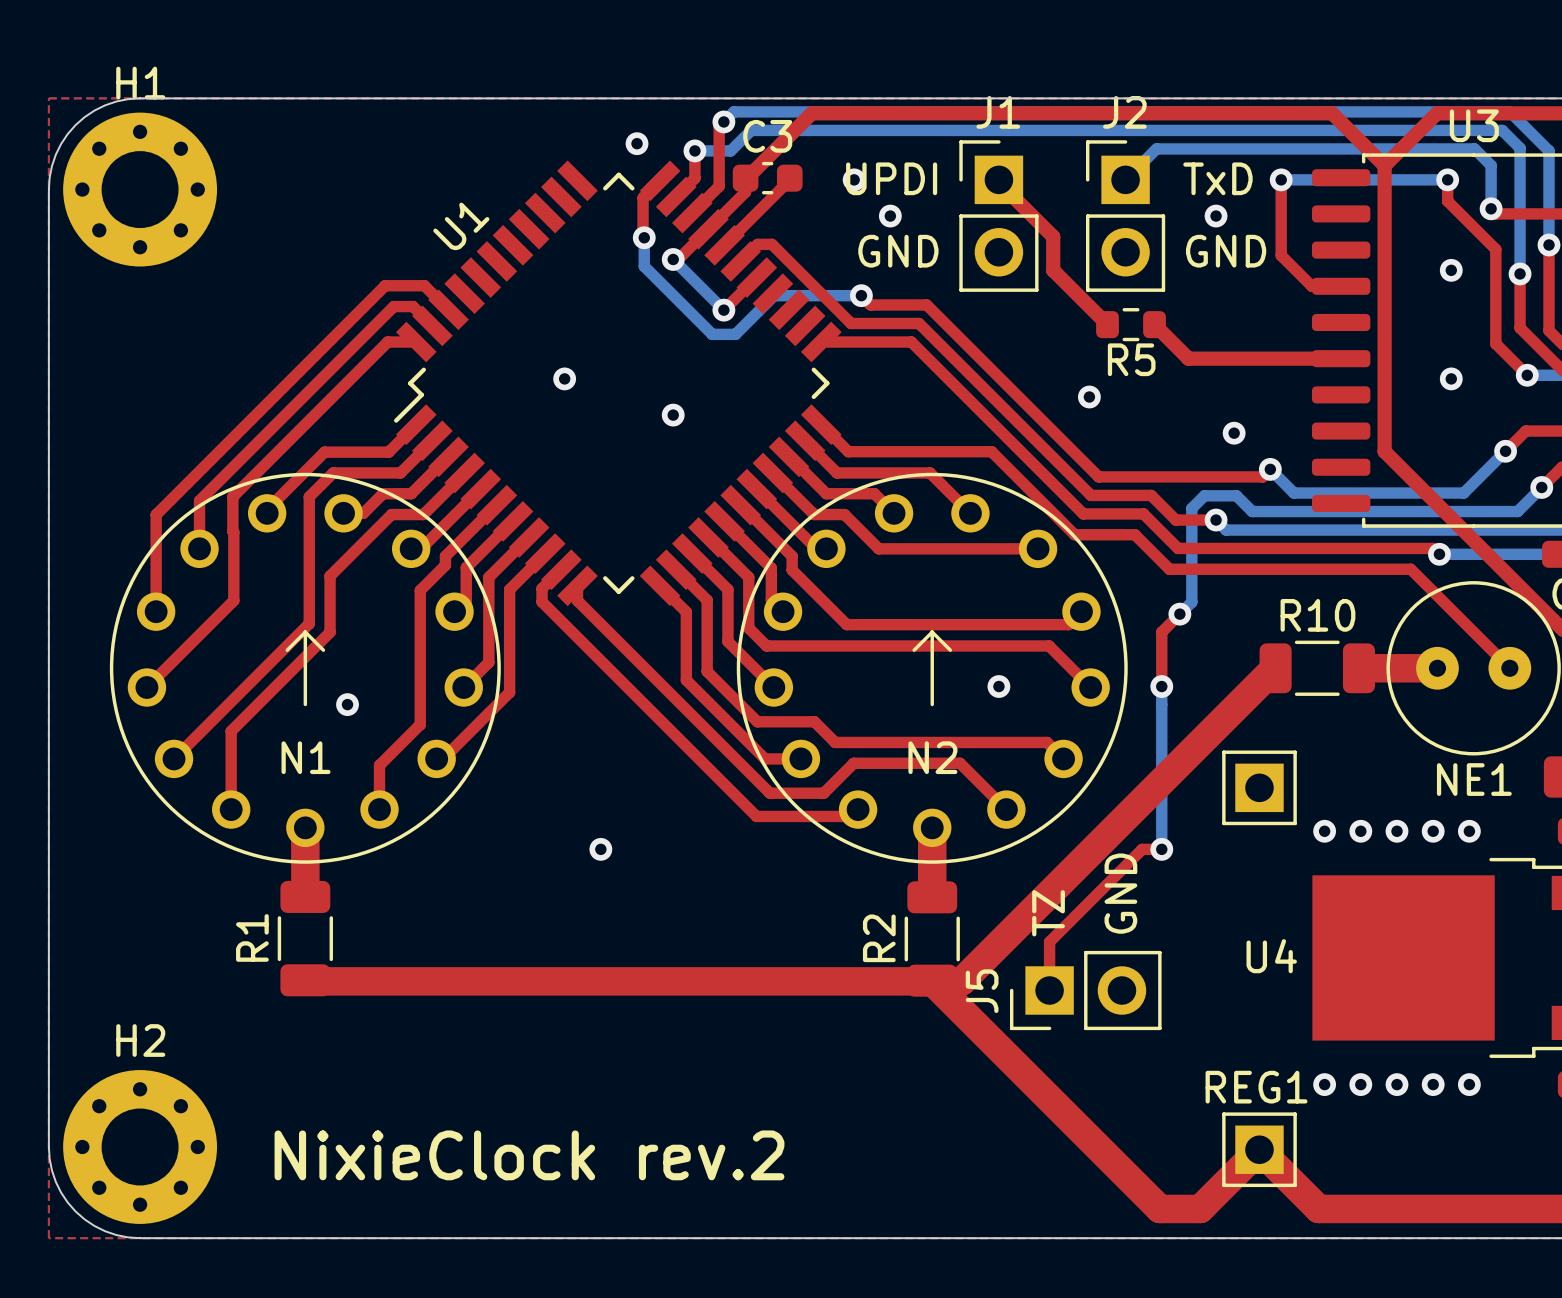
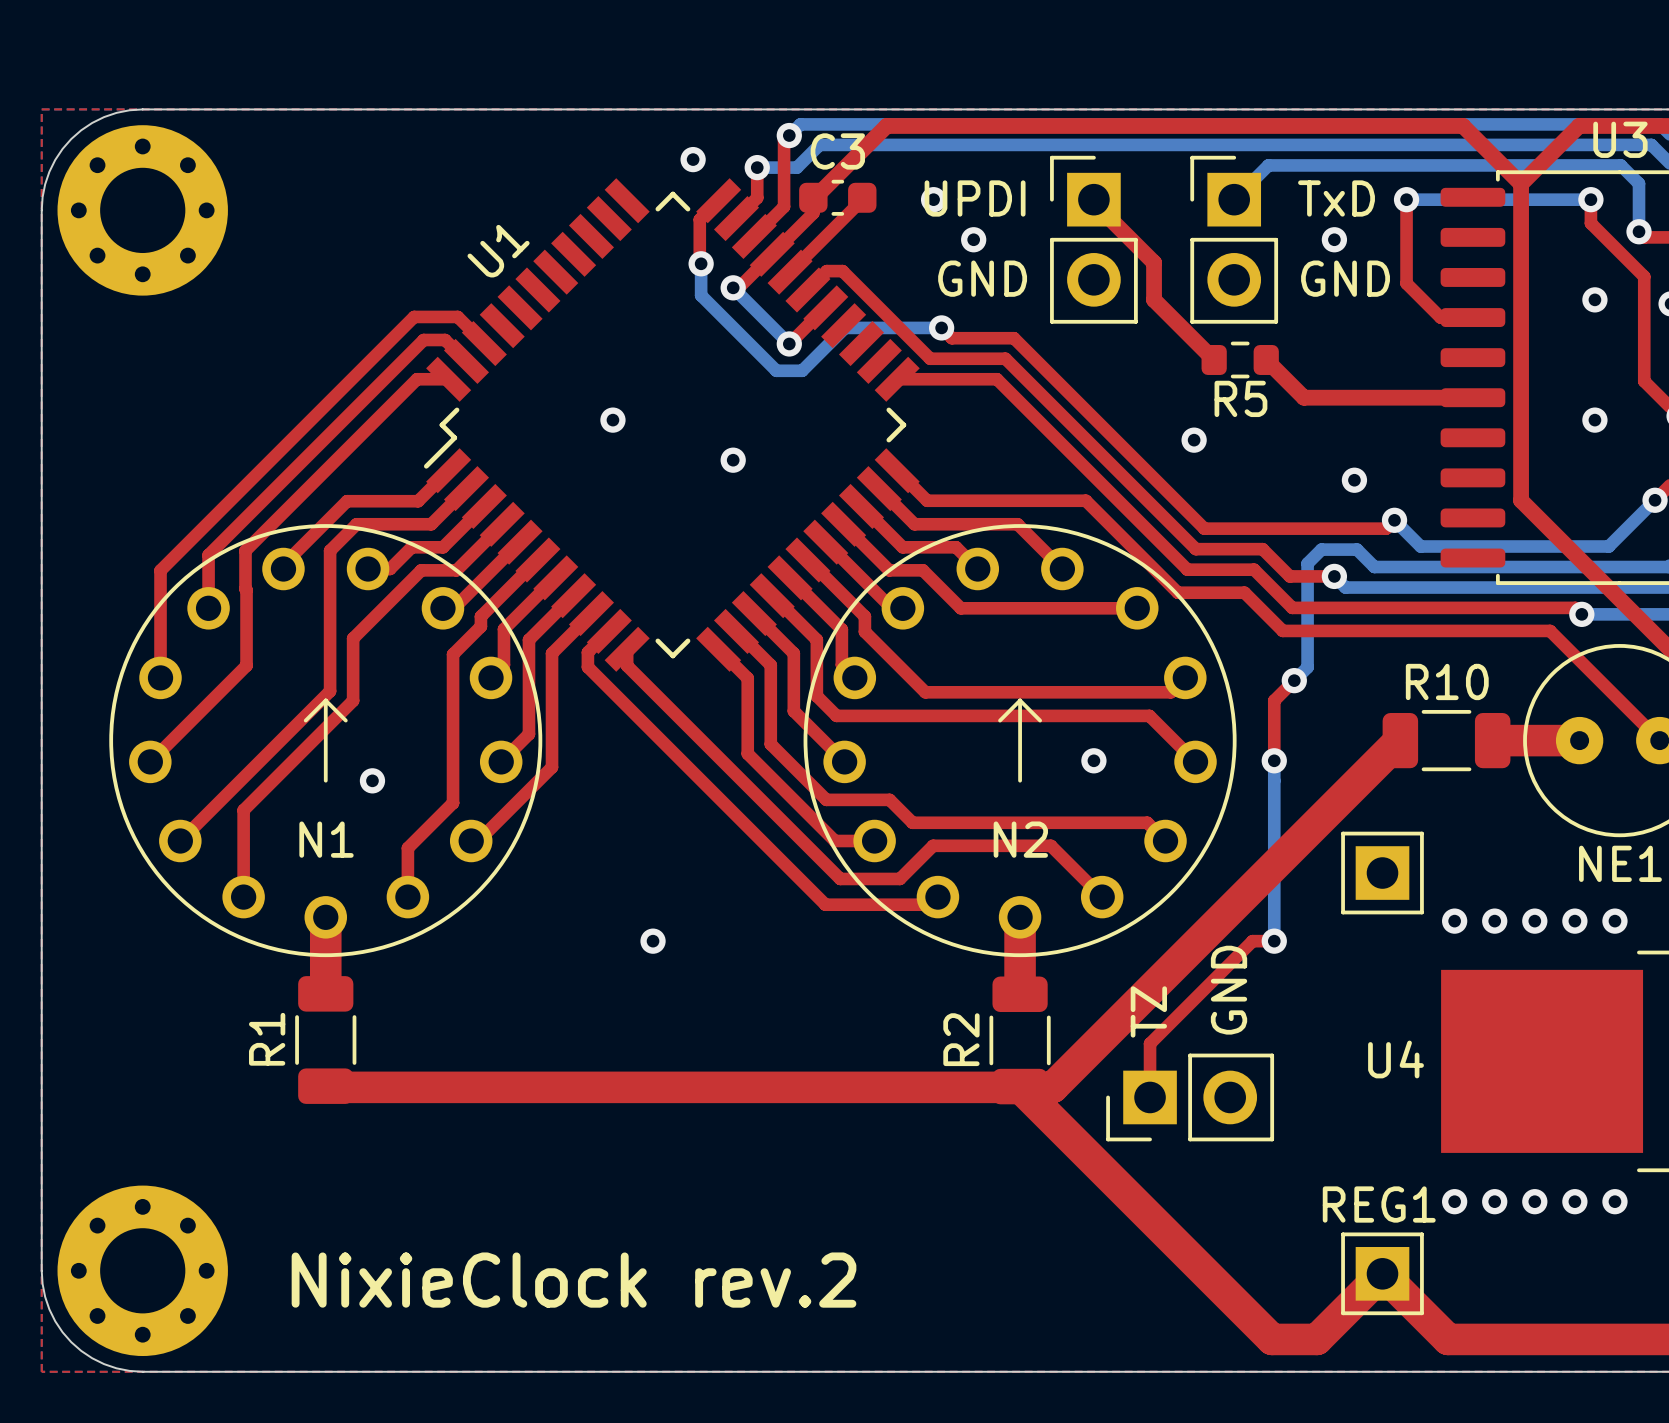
H1 name: H1 (140, 83) -> none
J1 name: J1 (998, 112) -> none
J2 name: J2 (1124, 112) -> none
J5 name: J5 (982, 991) -> none
H2 name: H2 (140, 1040) -> none

